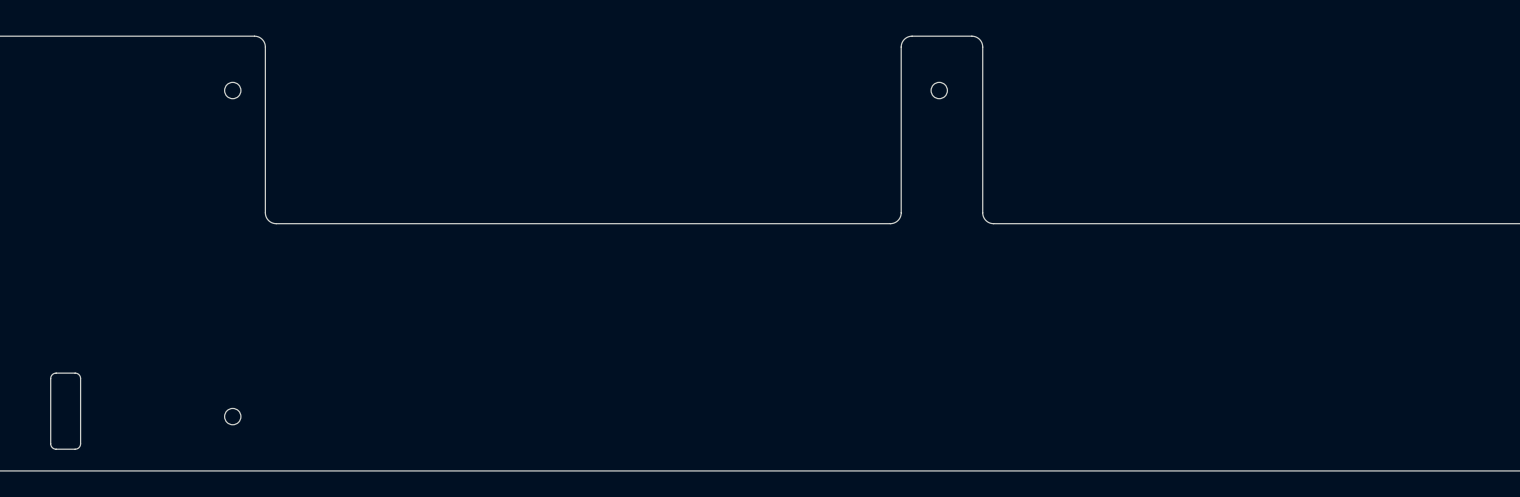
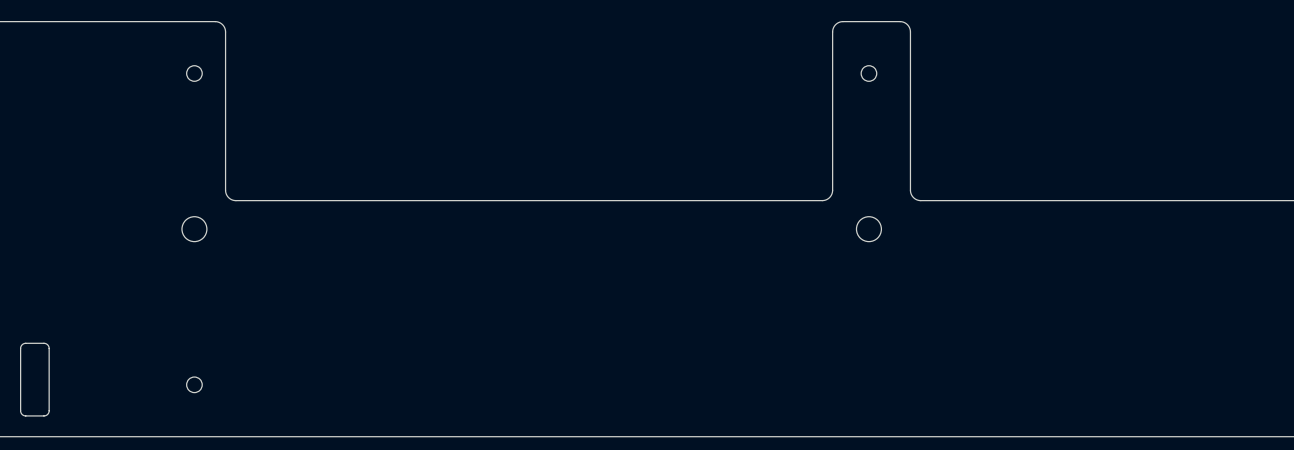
round board edge: none -> [181, 216, 208, 242]
round board edge: none -> [856, 216, 882, 242]

